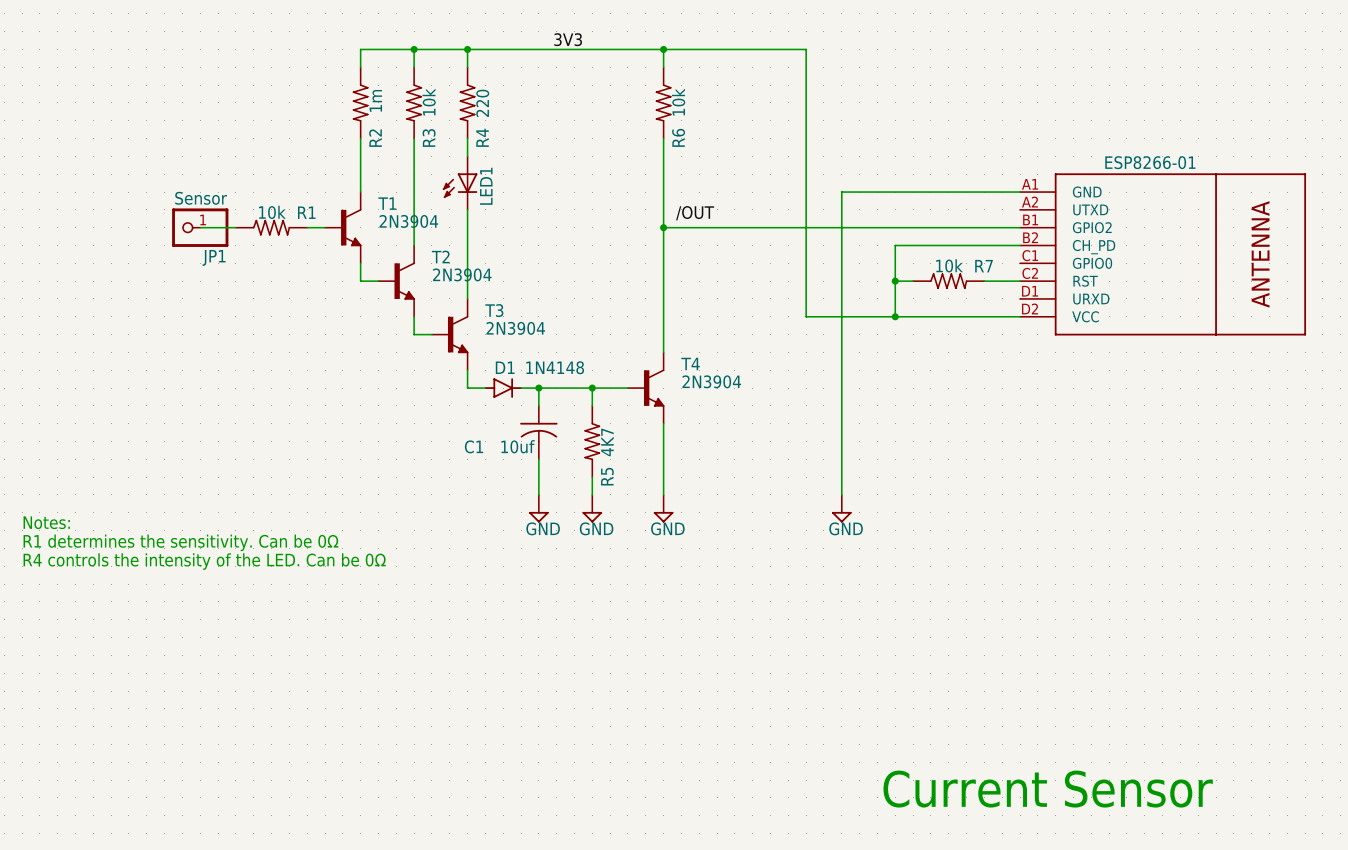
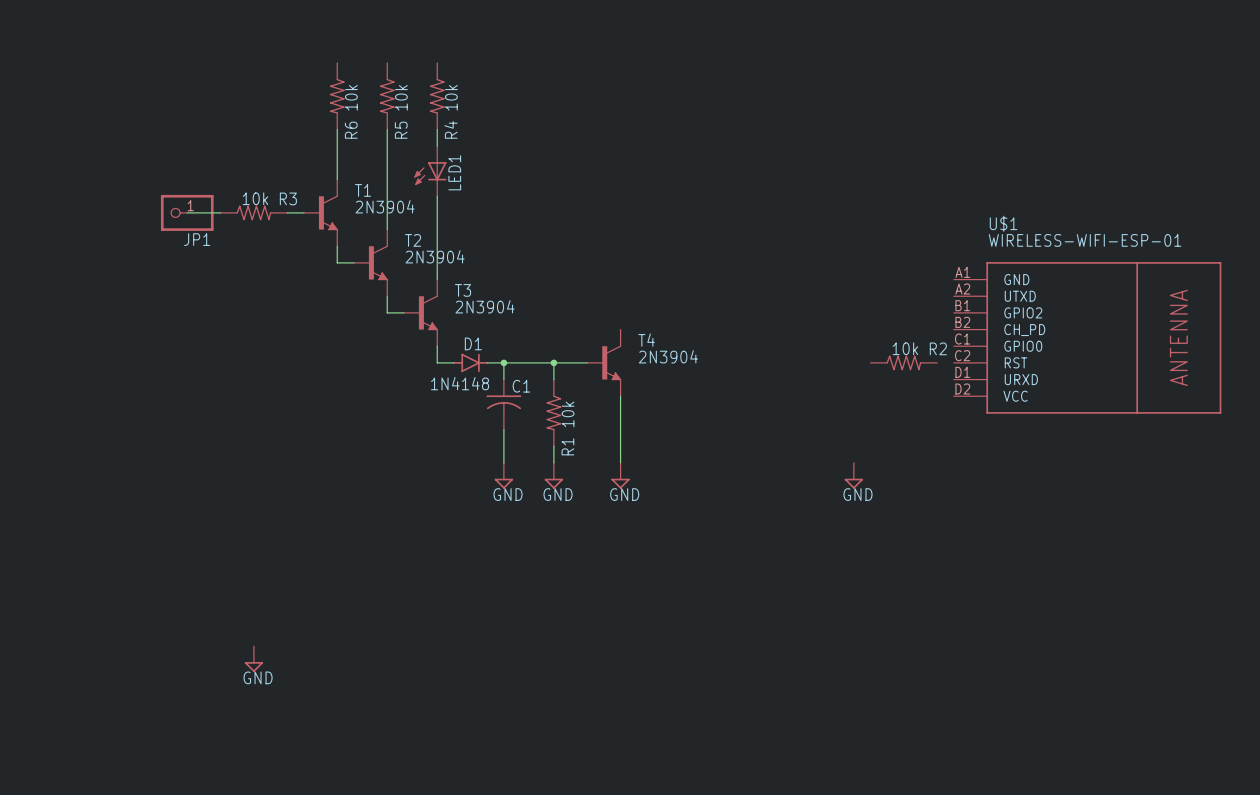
label: 3V3 (568, 39) -> none
wire: (414, 49) (414, 67) -> none
junction: (414, 49) -> none
wire: (467, 49) (467, 67) -> none
junction: (467, 49) -> none
wire: (663, 49) (663, 67) -> none
junction: (663, 49) -> none
wire: (360, 67) (360, 49) (806, 49) (806, 316) (1020, 316) -> none
R2 value: 1m (375, 100) -> 10k (351, 97)
R6: 10k (663, 102) -> none
R4 value: 220 (482, 103) -> 10k (451, 97)
R3 name: R3 (429, 137) -> R5 (401, 130)
R2 name: R2 (375, 138) -> R6 (351, 130)
wire: (663, 138) (663, 352) -> none
wire: (1020, 192) (841, 192) (841, 494) -> none
JP1 value: Sensor (201, 198) -> none
R1 name: R1 (306, 212) -> R3 (288, 198)
label: /OUT (695, 213) -> none
wire: (663, 227) (1020, 227) -> none
junction: (663, 227) -> none
wire: (1020, 245) (895, 245) (895, 316) -> none
ESP8266-01: (1163, 254) -> none
wire: (895, 281) (913, 281) -> none
junction: (895, 281) -> none
R7: 10k (948, 281) -> none
wire: (984, 281) (1020, 281) -> none
junction: (895, 316) -> none
U$1: none -> WIRELESS-WIFI-ESP-01 (1087, 337)
D1 value position: 1N4148 (555, 367) -> 1N4148 (460, 383)
R2: none -> 10k (903, 362)
R5 value: 4K7 (607, 442) -> 10k (568, 414)
C1 name position: C1 (474, 446) -> C1 (521, 386)
C1 value: 10uf (518, 446) -> none
R5 name: R5 (607, 476) -> R1 (567, 446)
power symbol position: GND (841, 508) -> GND (853, 475)
text: Notes: (46, 522) -> none
text: R1 determines the sensitivity. Can be 0Ω (180, 542) -> none
text: R4 controls the intensity of the LED. Can be 0Ω (204, 561) -> none
power symbol: none -> GND (253, 659)
text: Current Sensor (1048, 789) -> none

